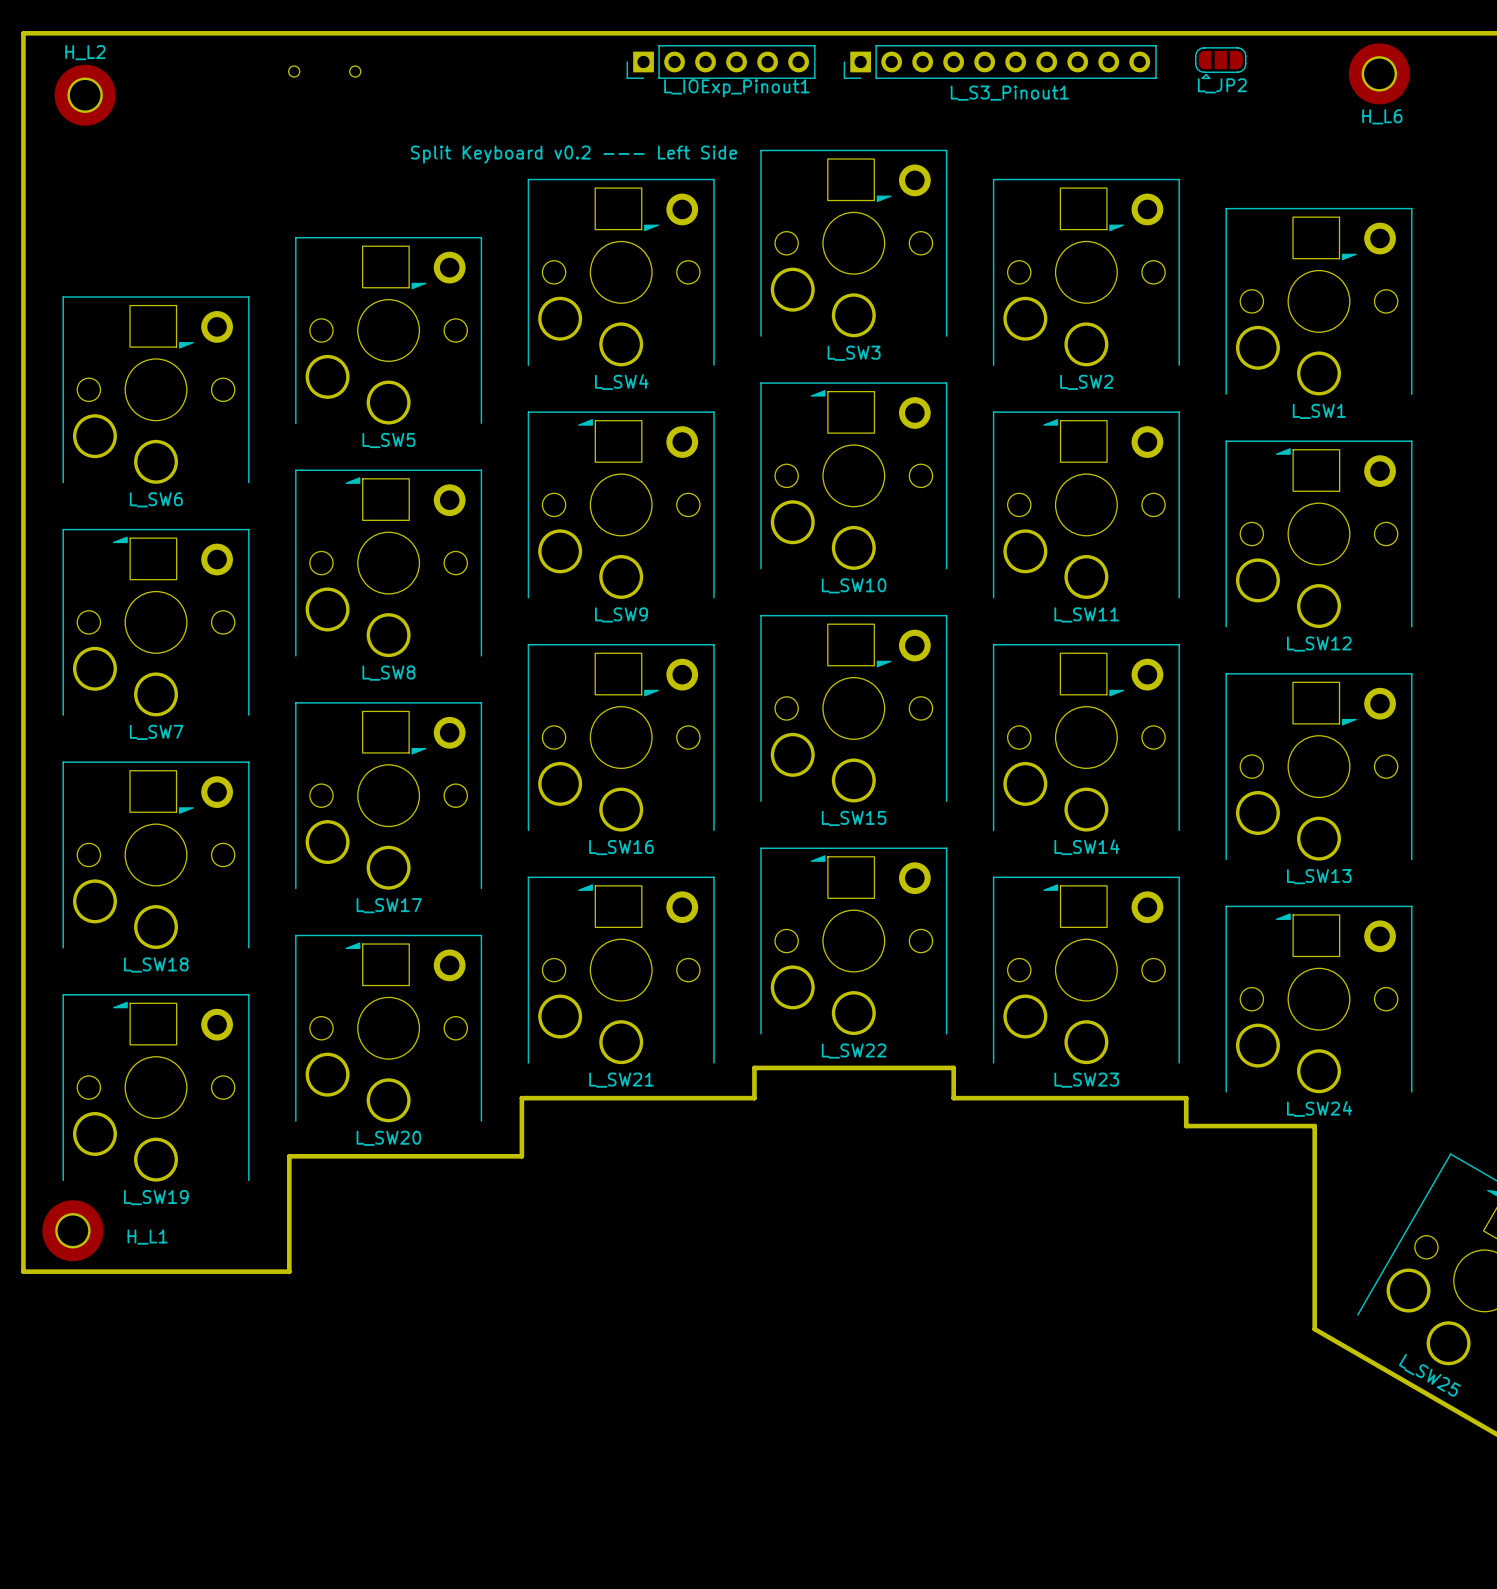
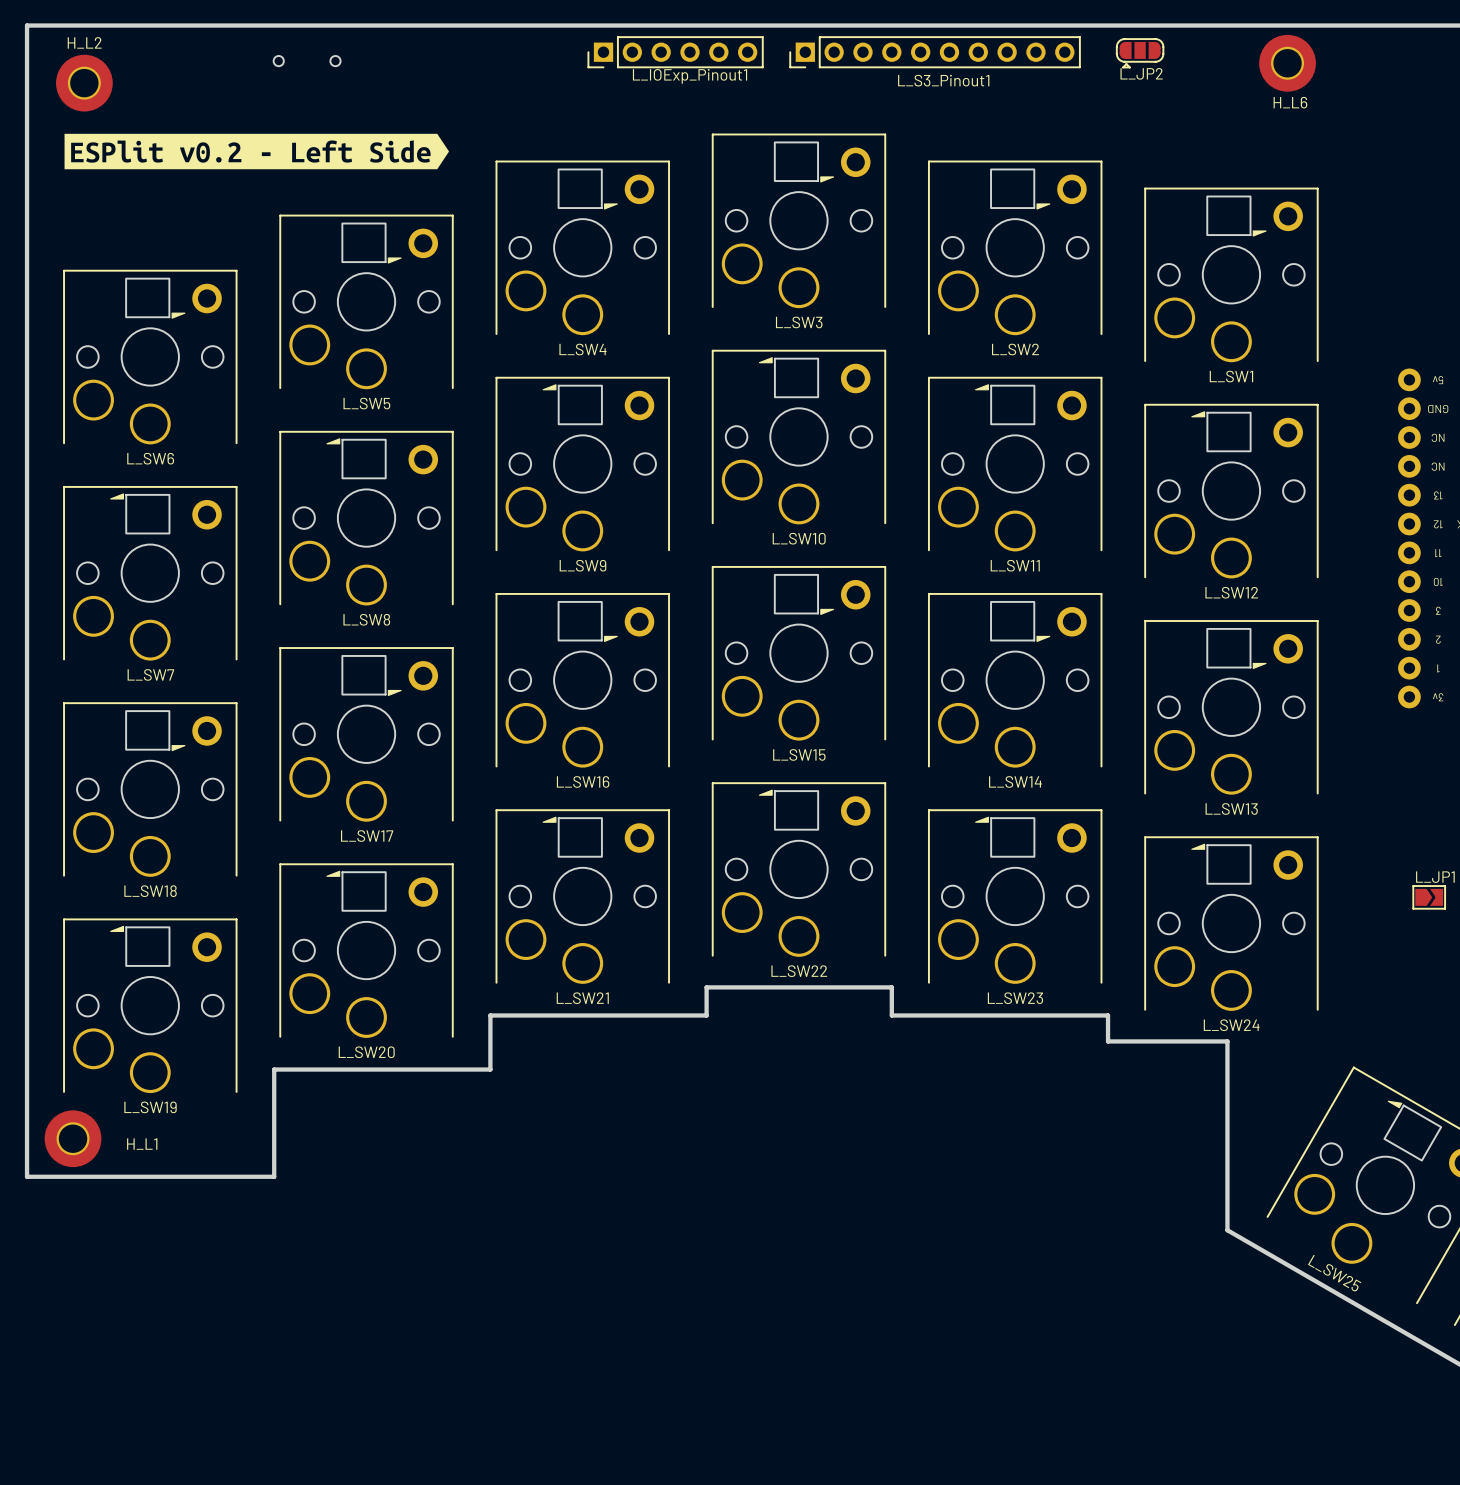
drawing: none -> [64, 133, 450, 170]
text: Split Keyboard v0.2 --- Left Side (574, 154) -> none

